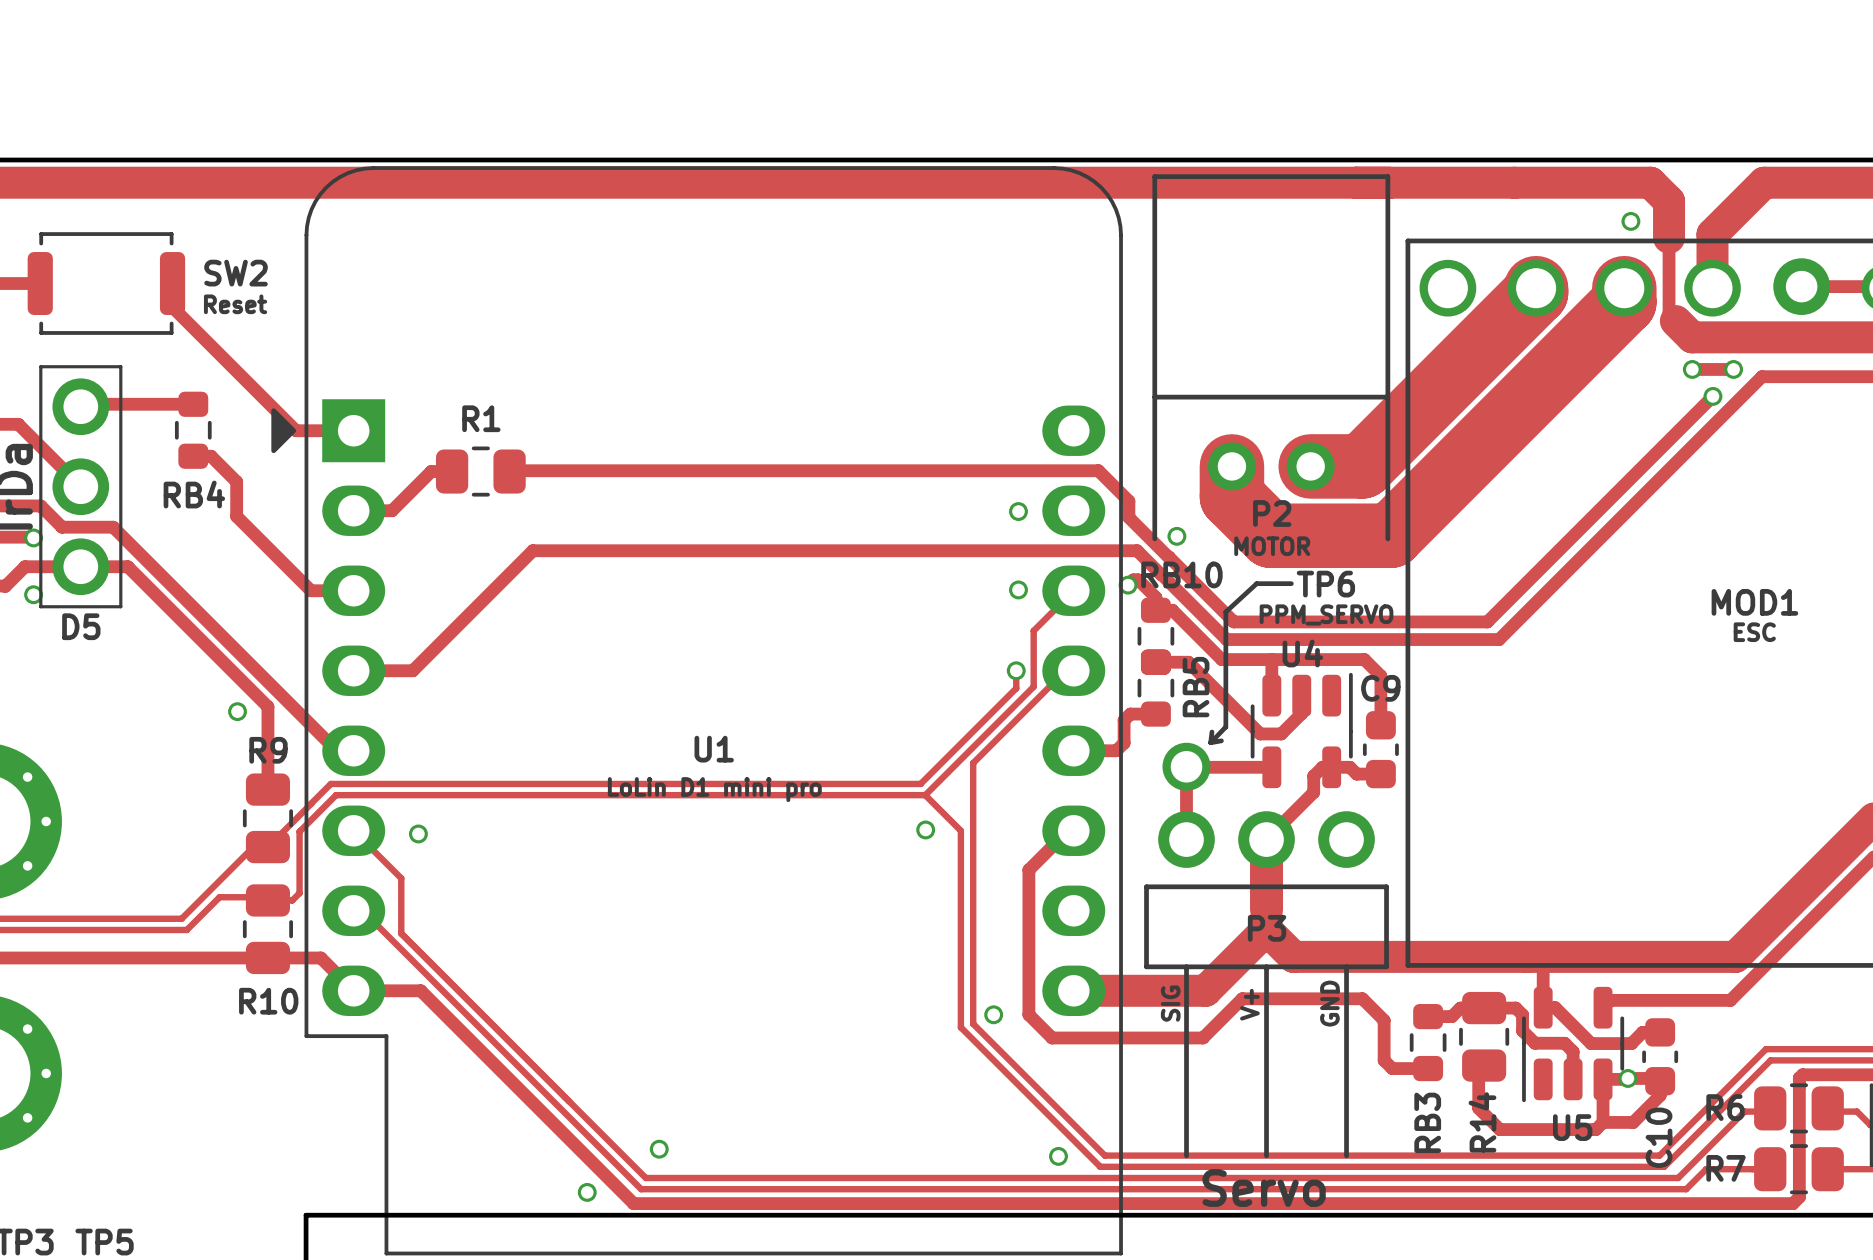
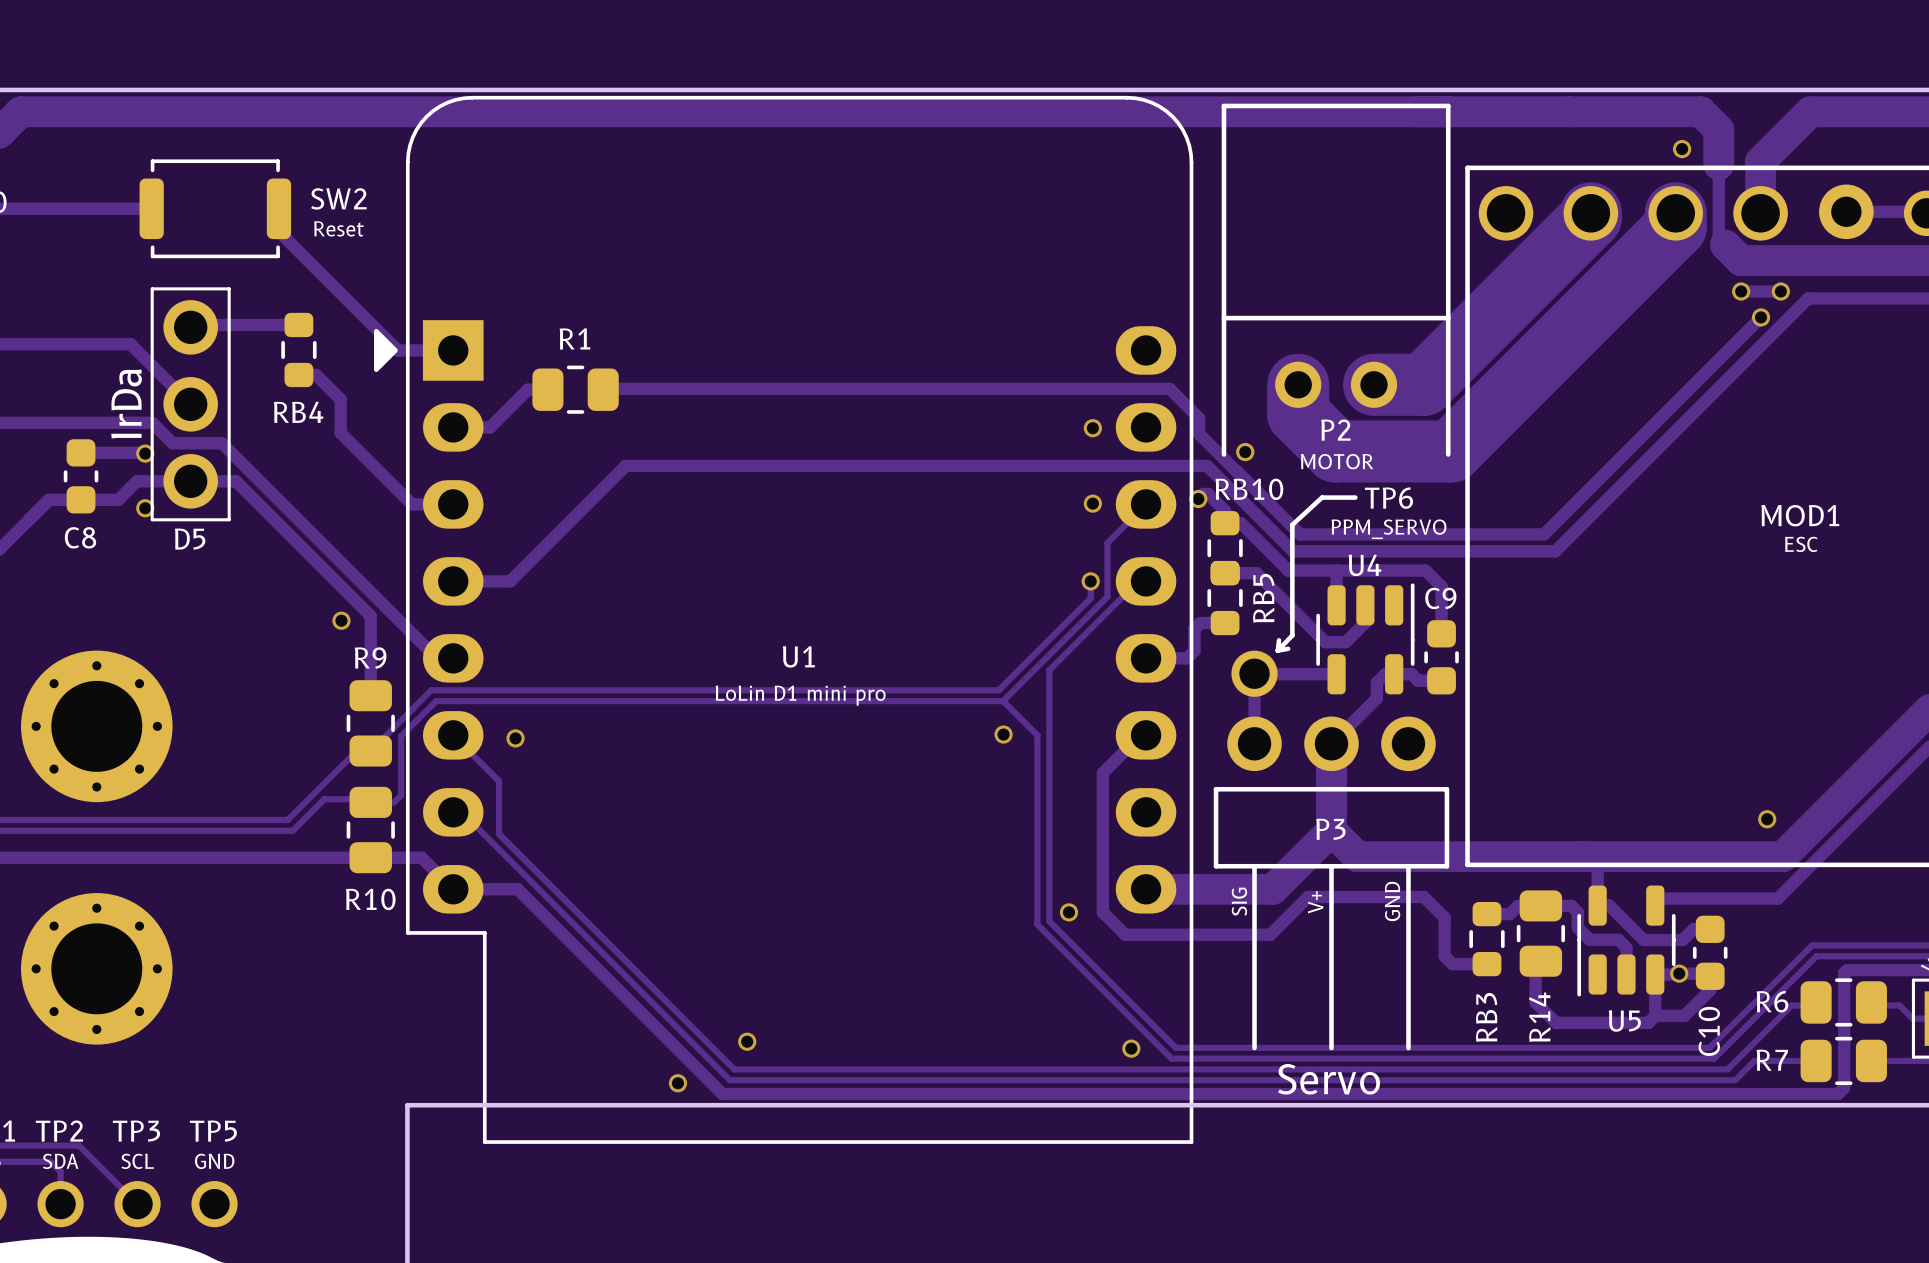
via: none -> (1767, 819)

